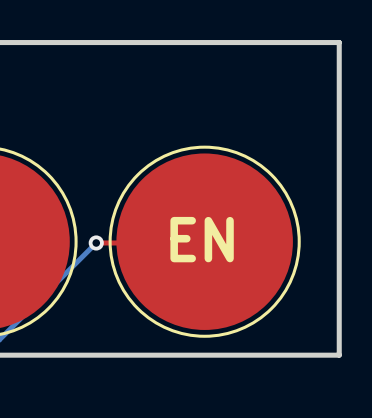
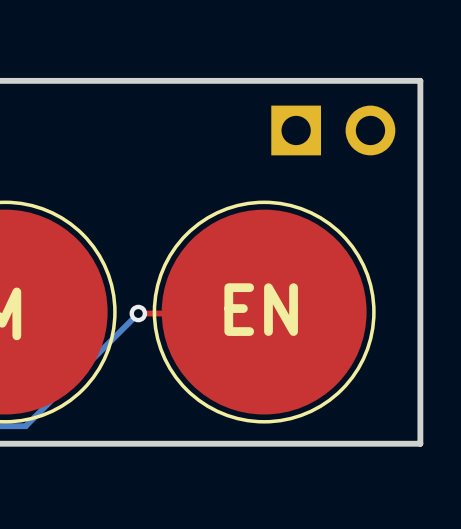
part: none -> (333, 130)

